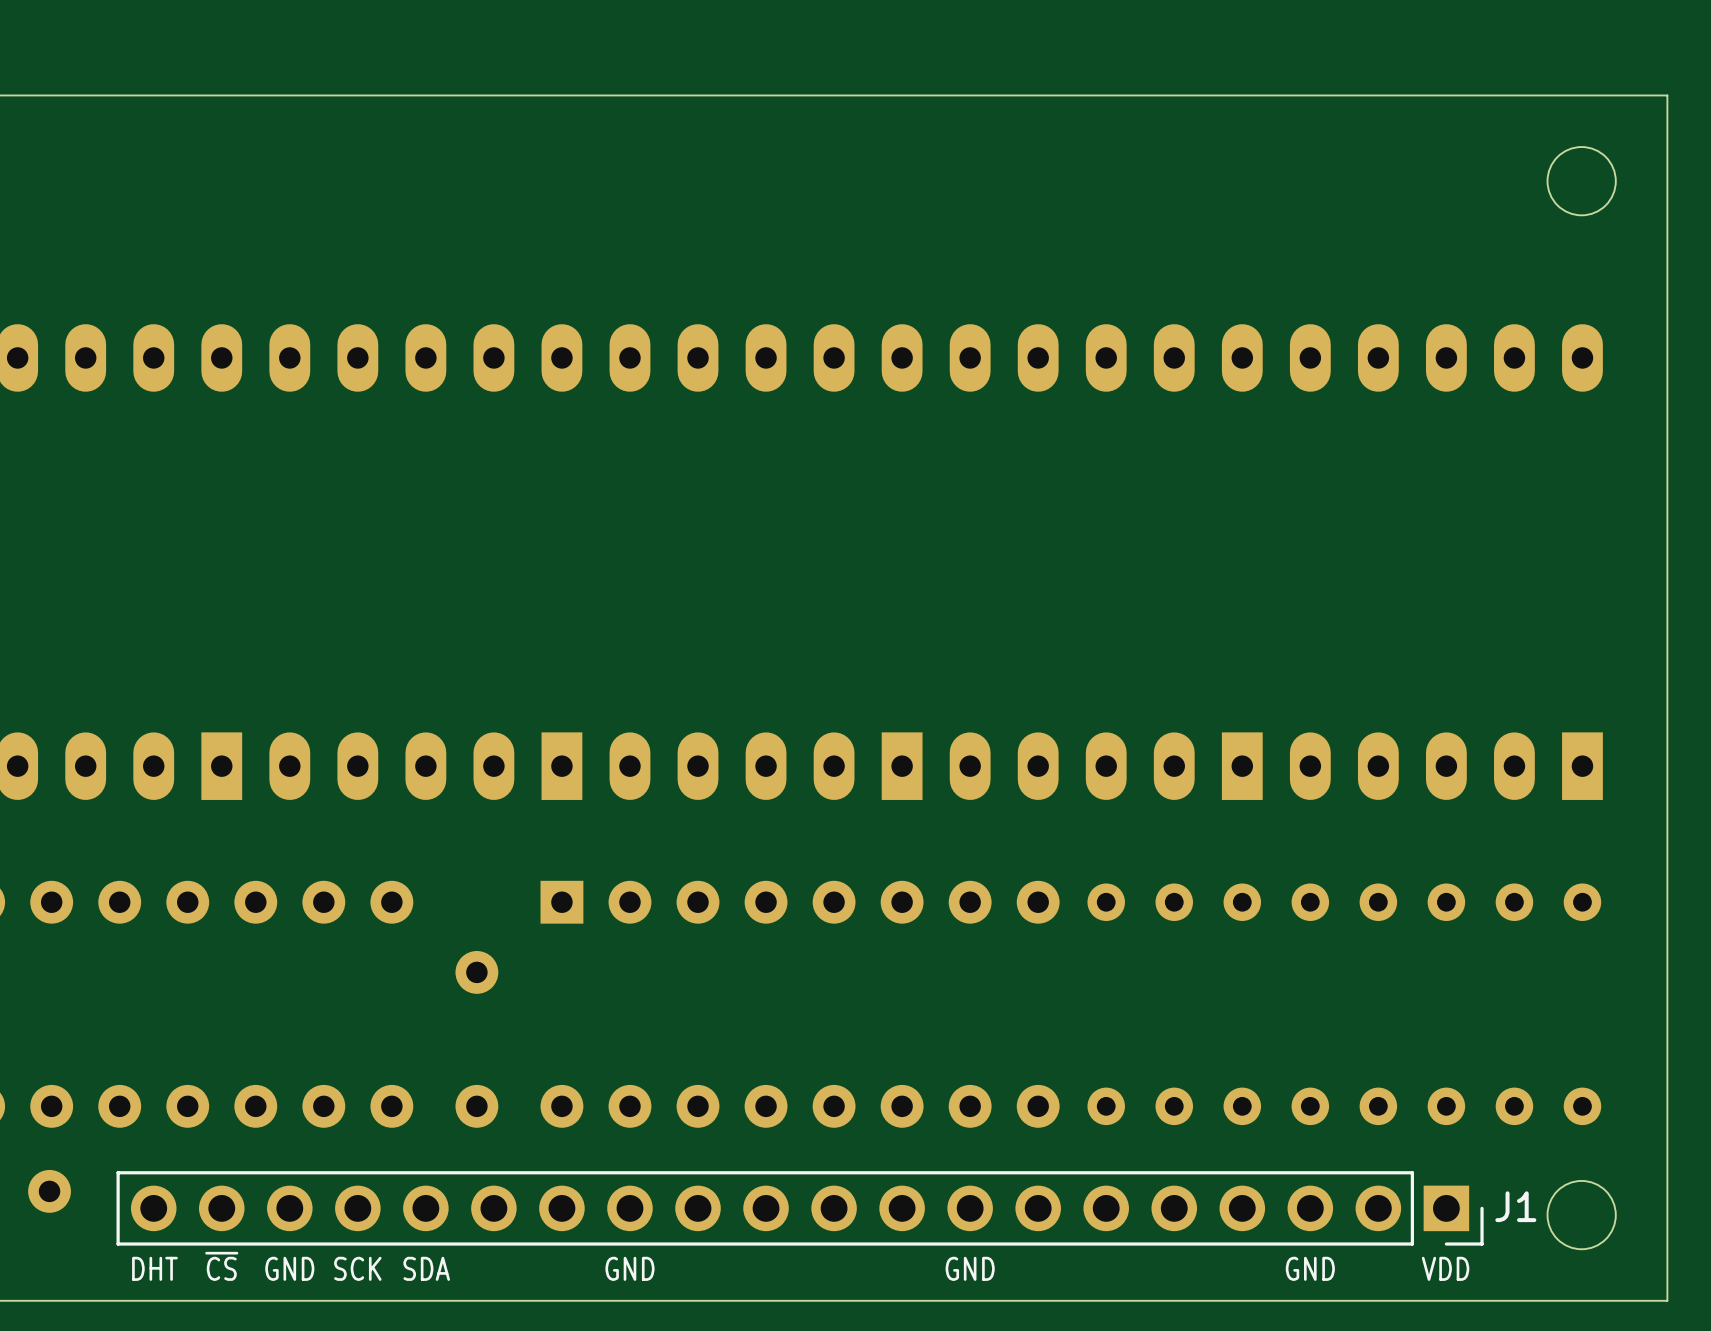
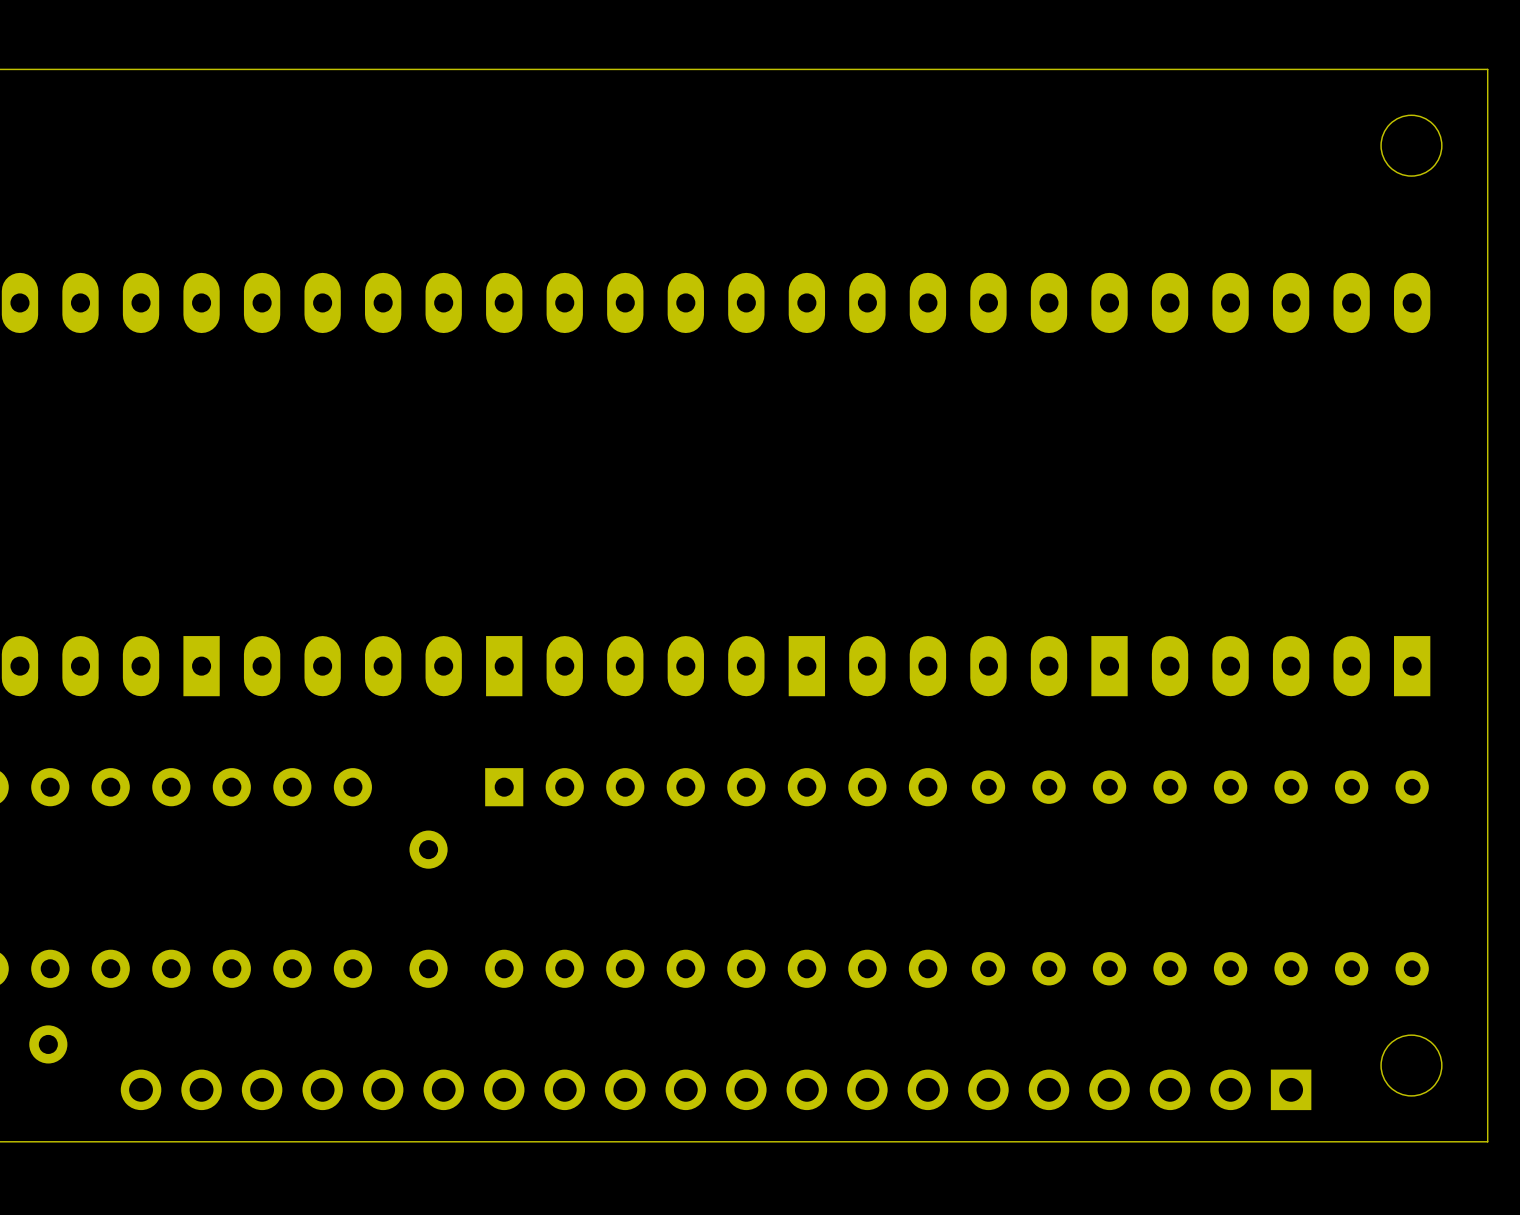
J1 side: bottom (800, 1208) -> top (716, 1089)
text: ~{CS} (221, 1266) -> none
text: DHT (154, 1268) -> none
text: GND (289, 1268) -> none
text: SCK (357, 1268) -> none
text: SDA (426, 1268) -> none
text: GND (629, 1268) -> none
text: GND (970, 1268) -> none
text: GND (1310, 1268) -> none
text: VDD (1445, 1268) -> none

